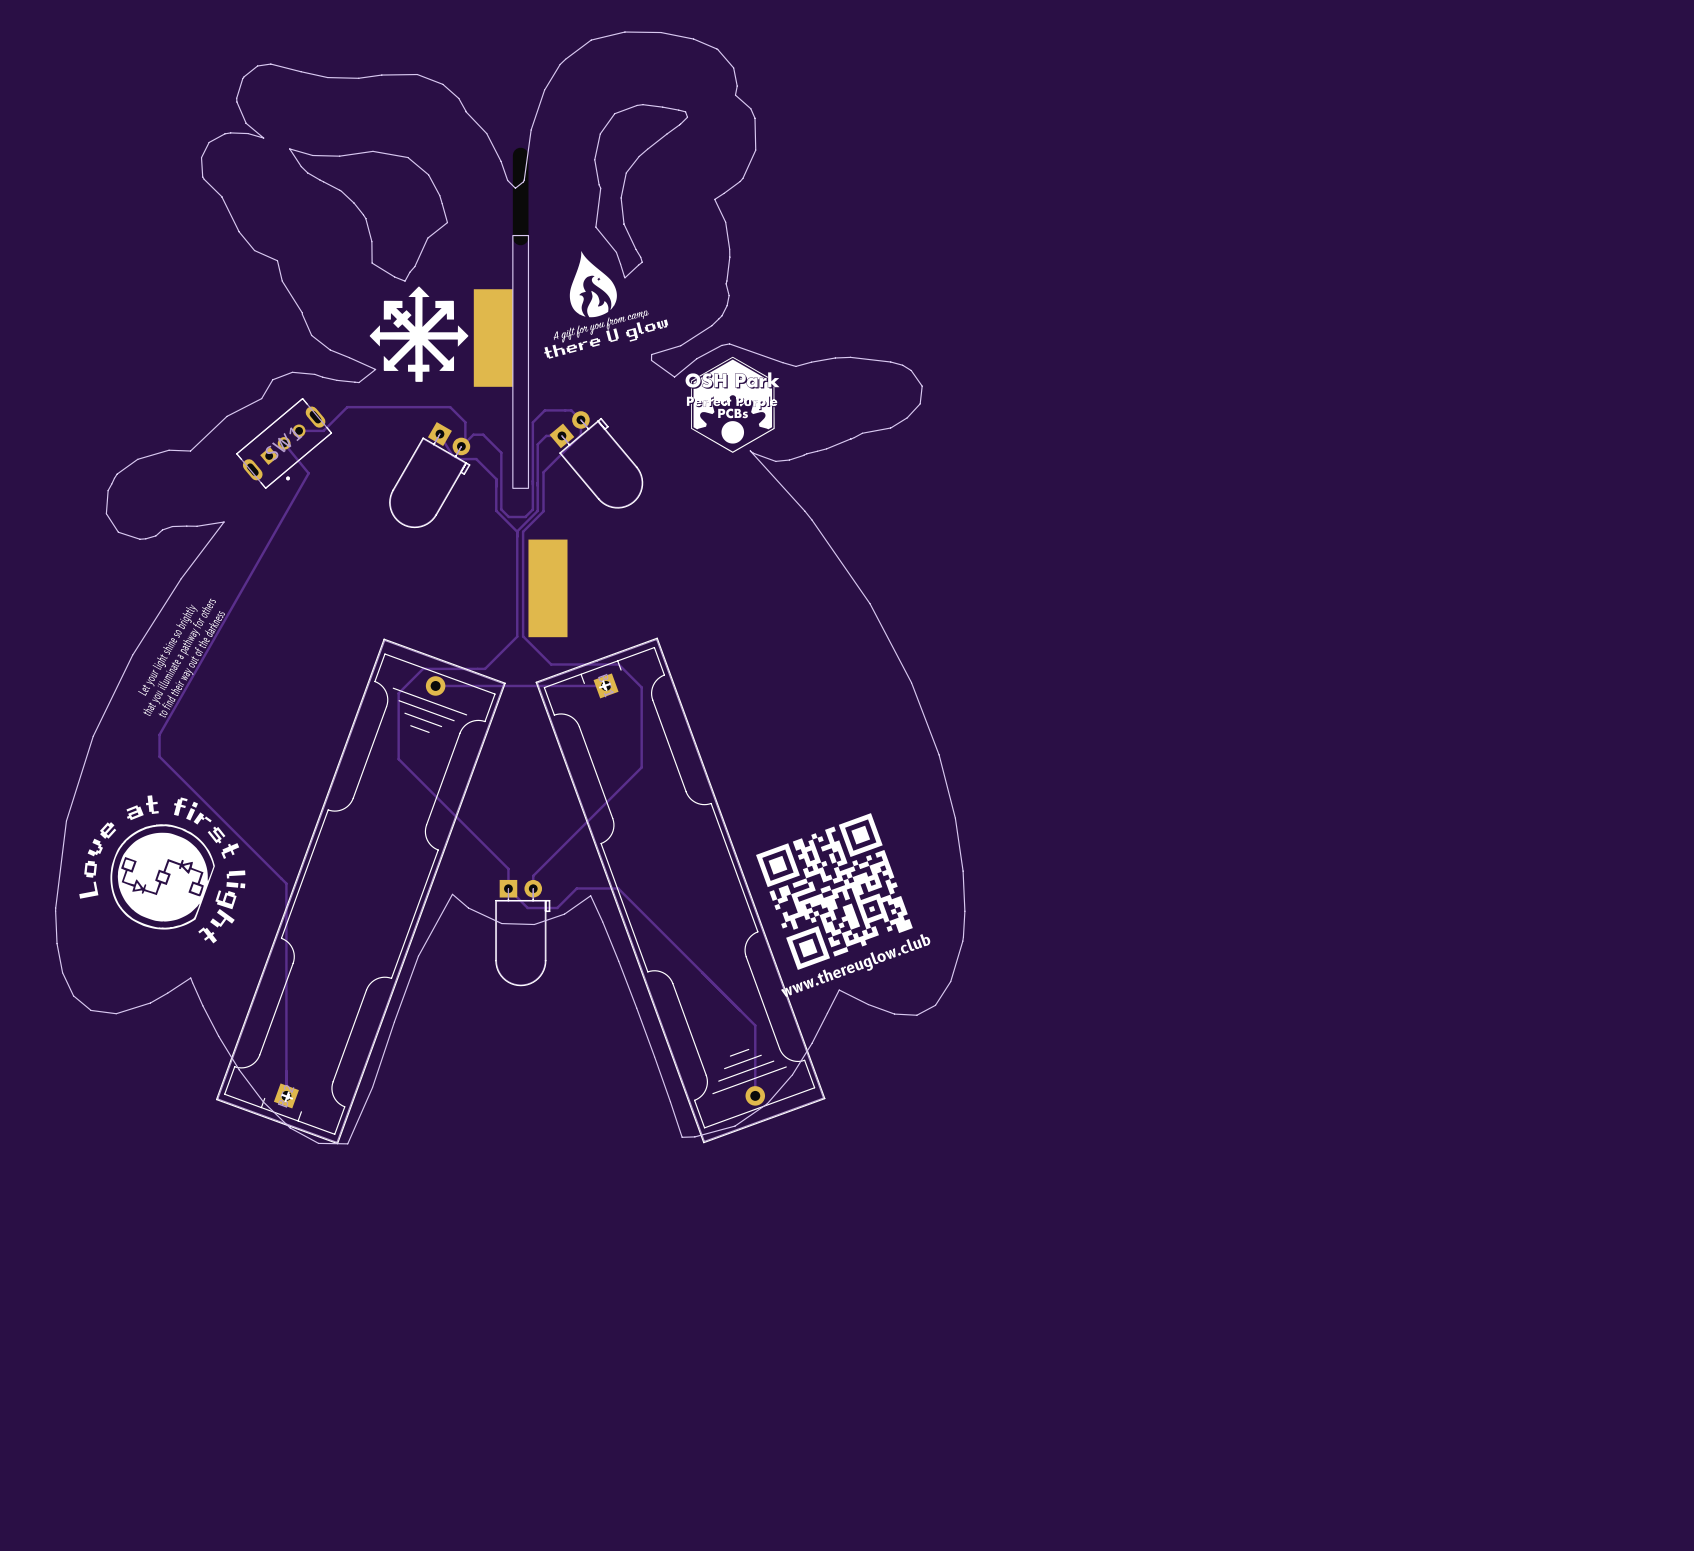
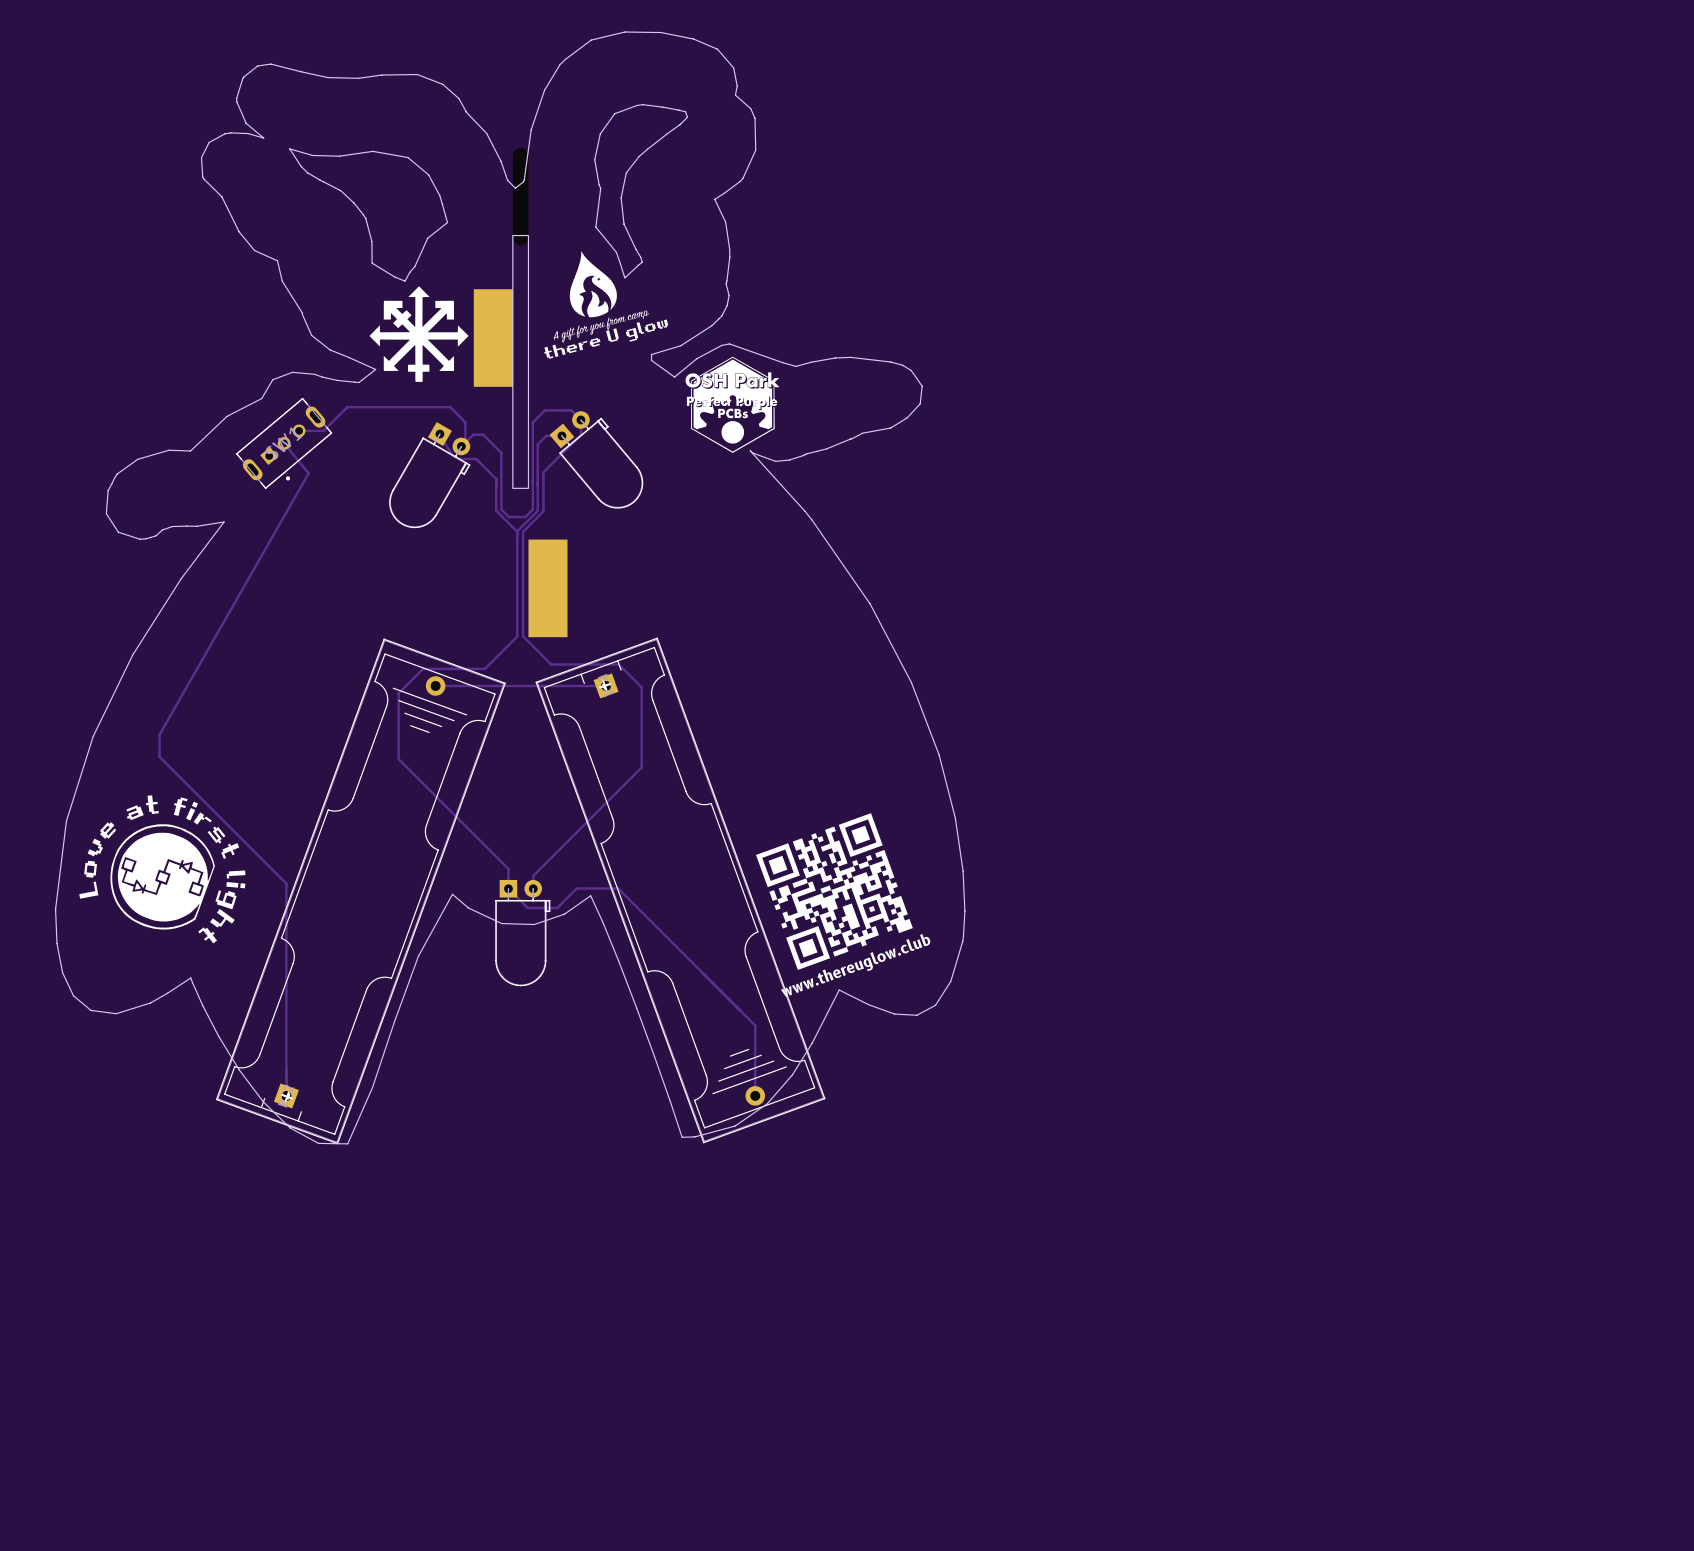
text: Let your light shine so brightly (167, 650) -> none
text: that you illuminate a pathway for others (179, 657) -> none
text: to find their way out of the darkness (191, 664) -> none

